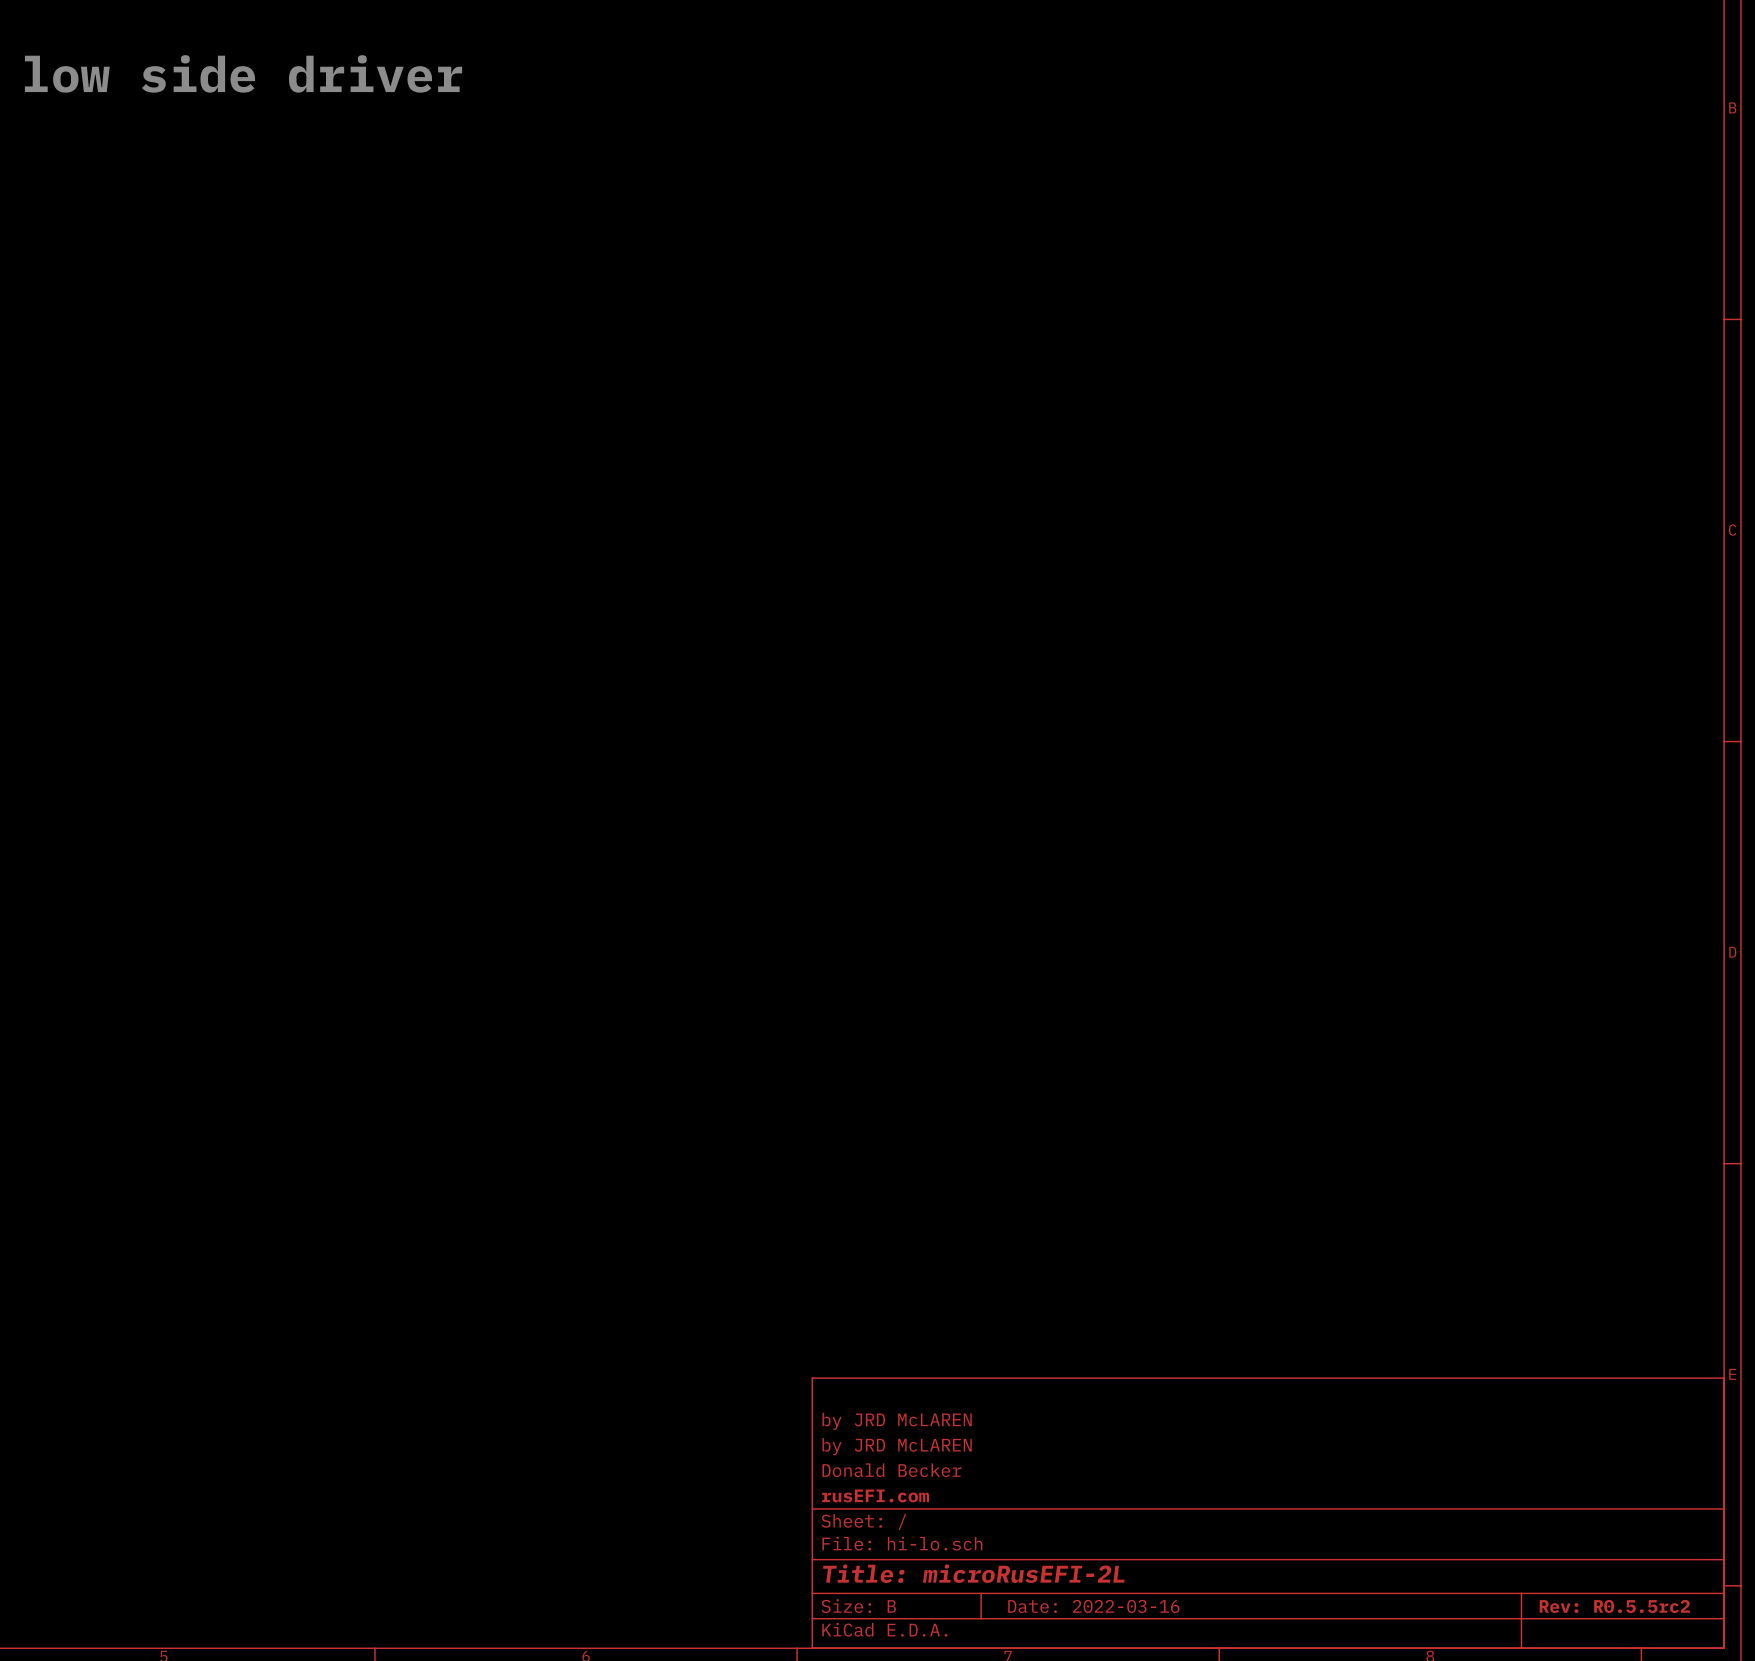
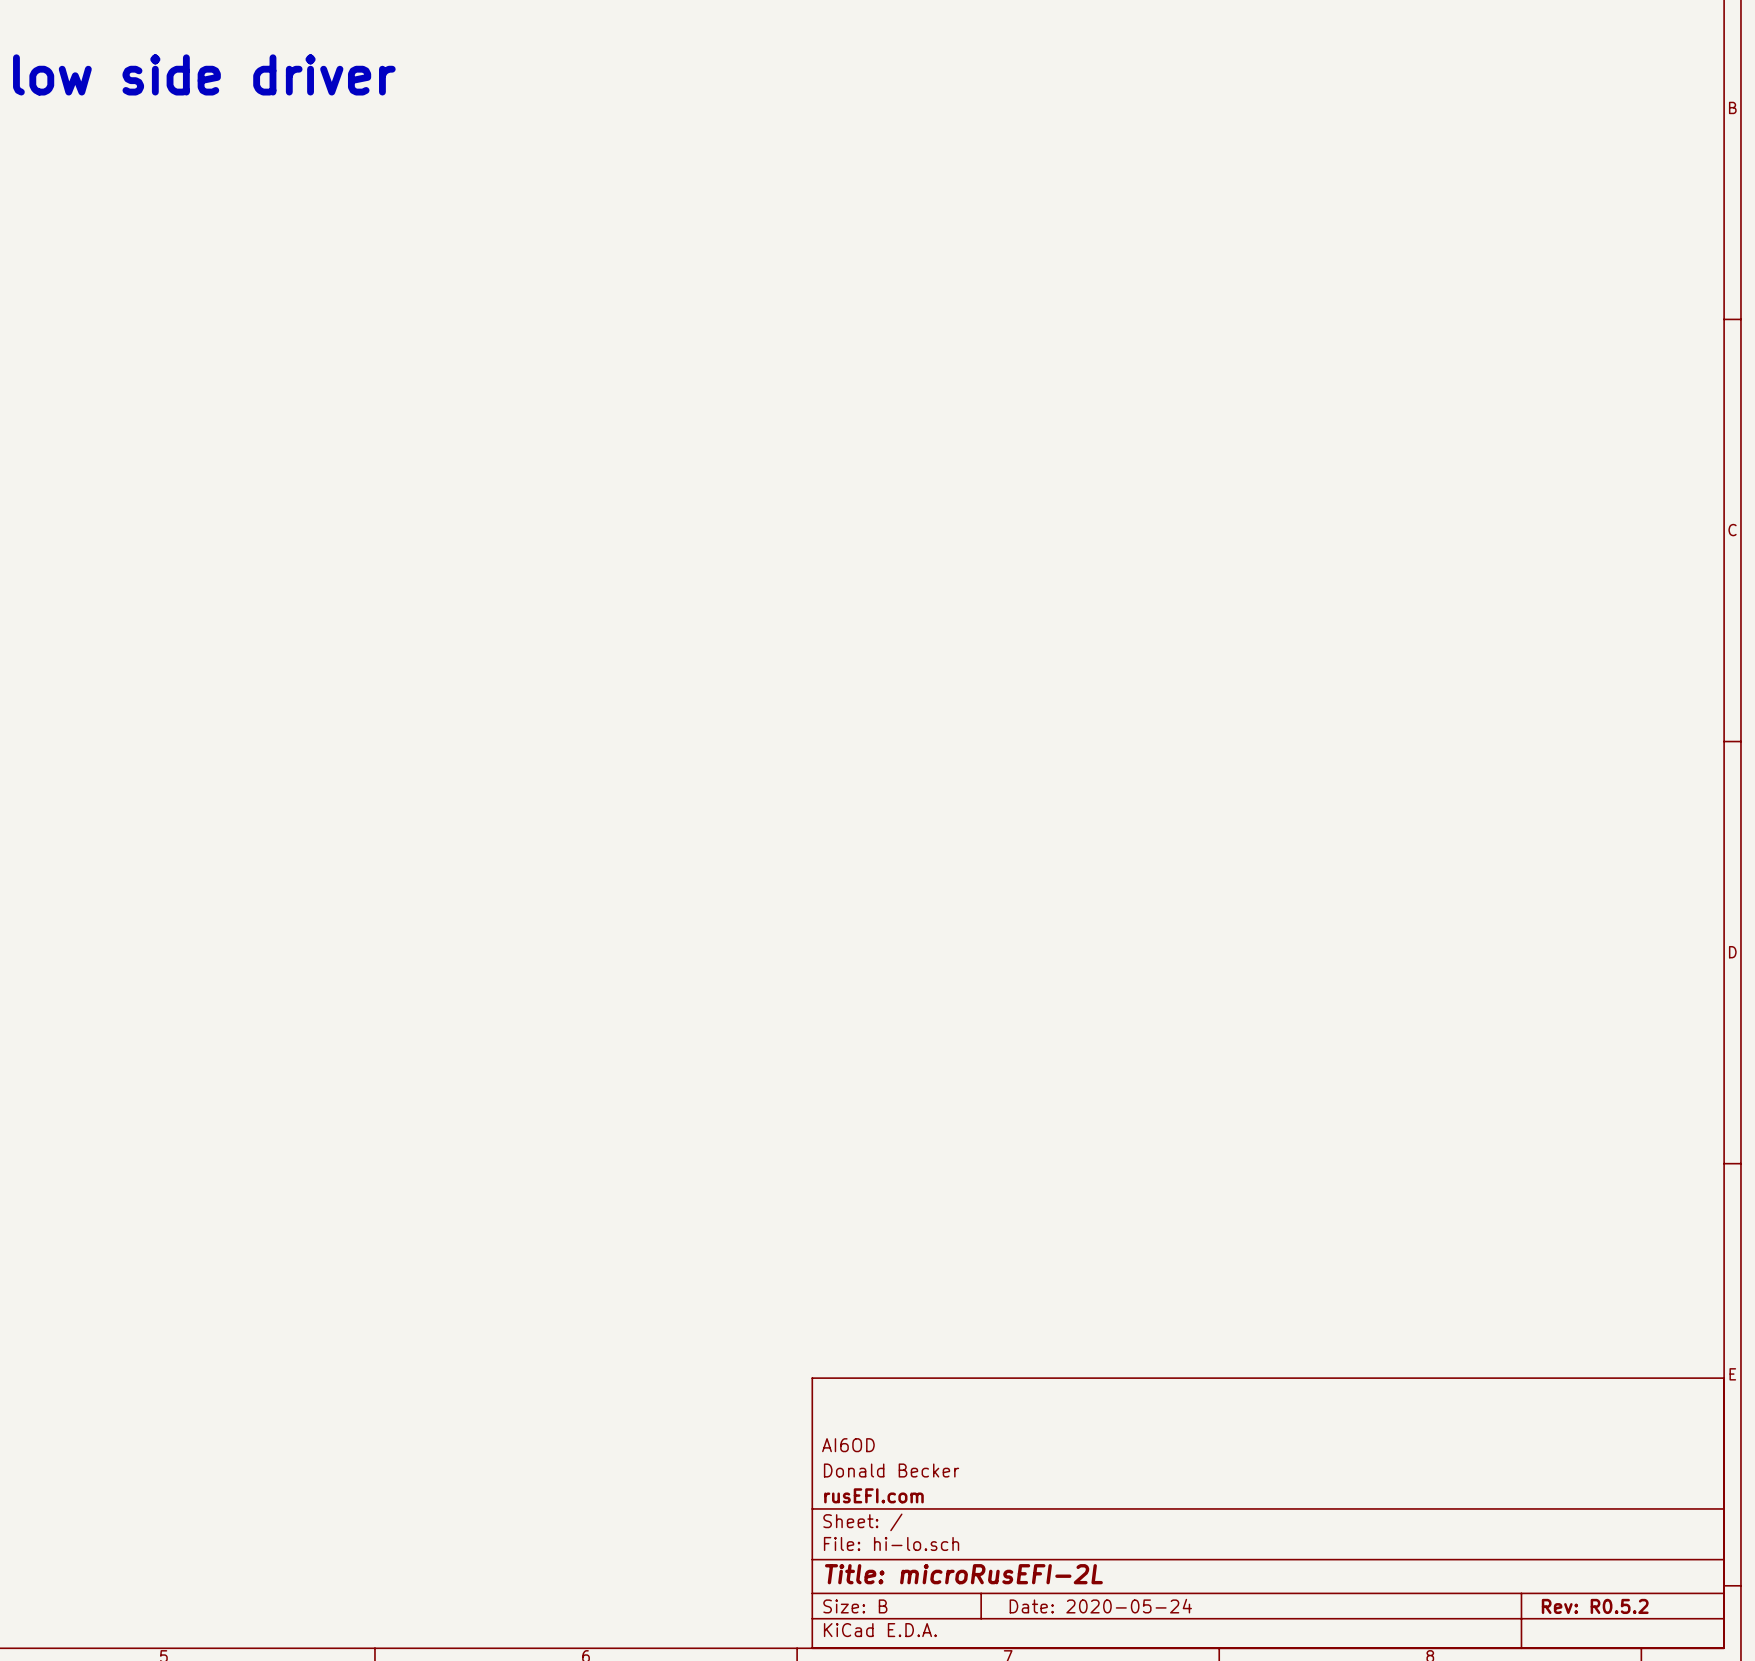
title block: by JRD McLAREN (897, 1421) -> none
title block: by JRD McLAREN (897, 1446) -> AI6OD (848, 1445)
title block: Date: 2022-03-16 (1093, 1606) -> Date: 2020-05-24 (1100, 1606)
title block: Rev: R0.5.5rc2 (1614, 1606) -> Rev: R0.5.2 (1595, 1606)

